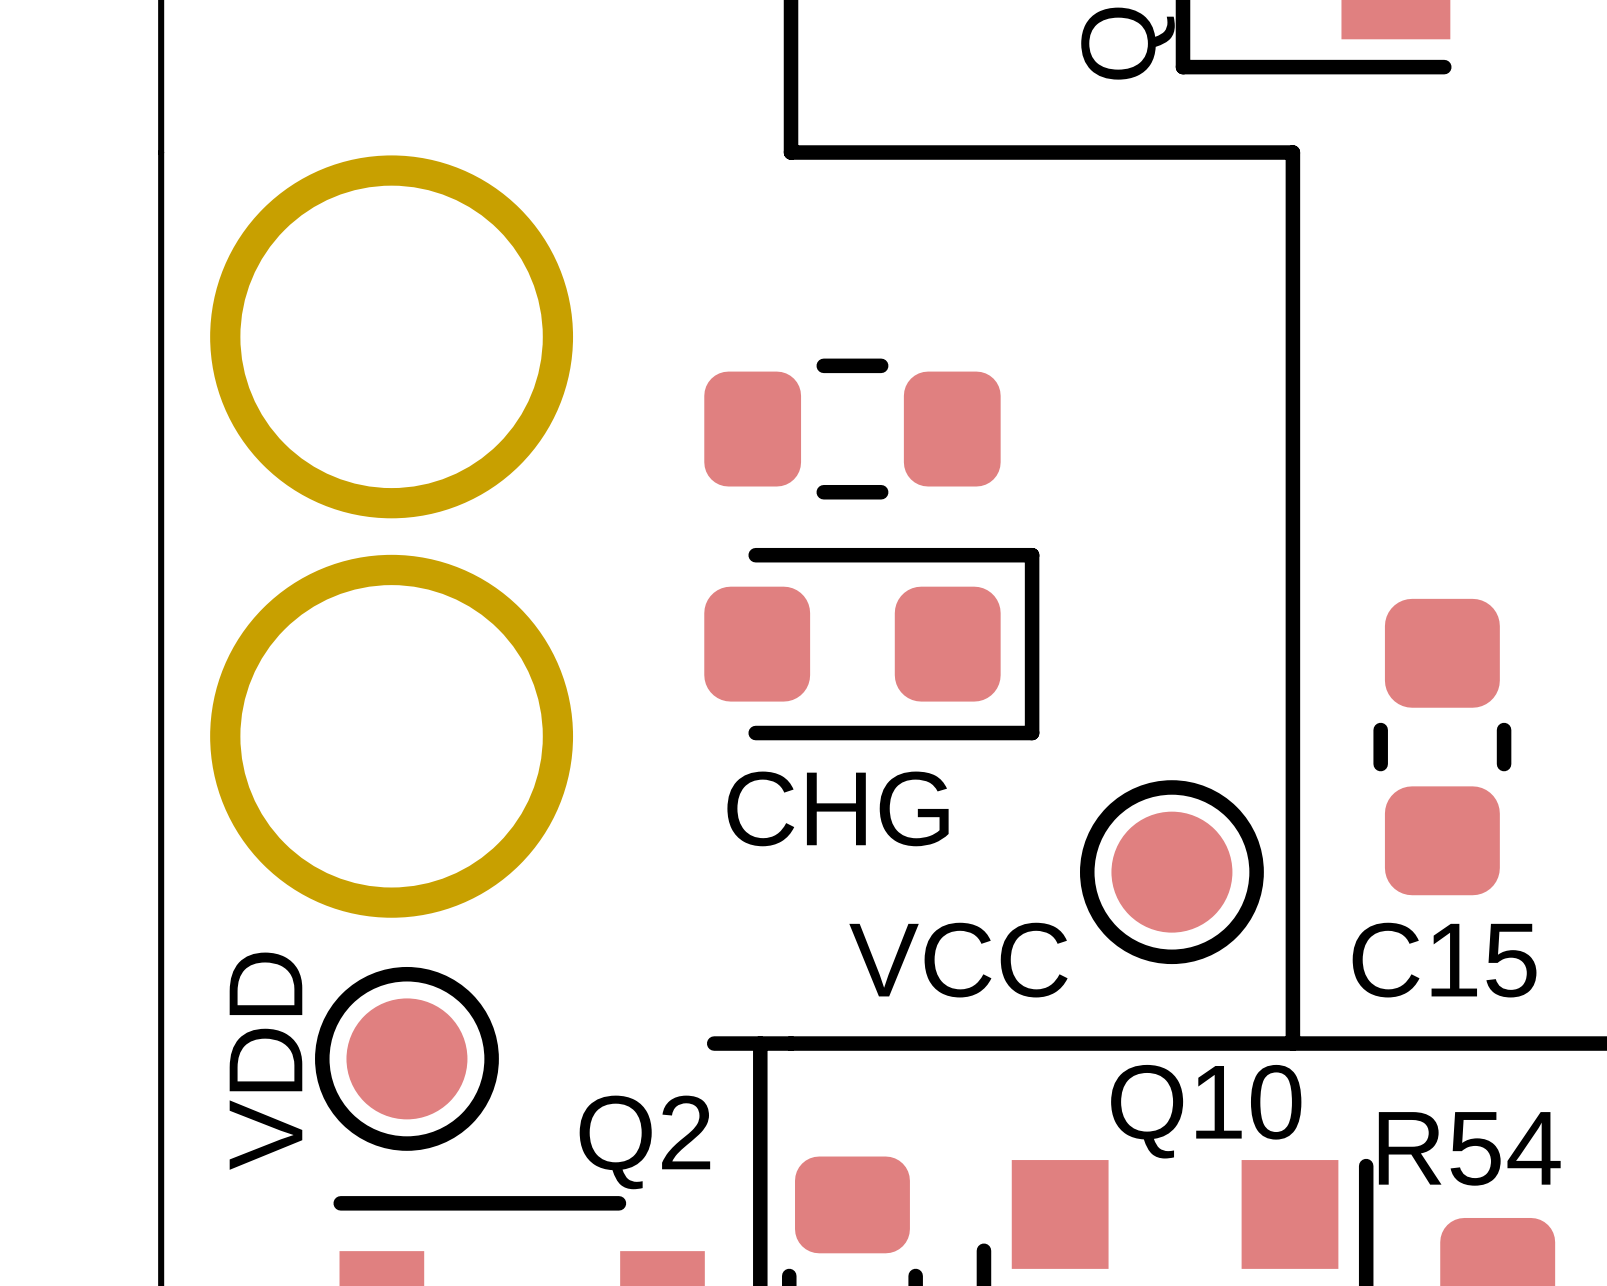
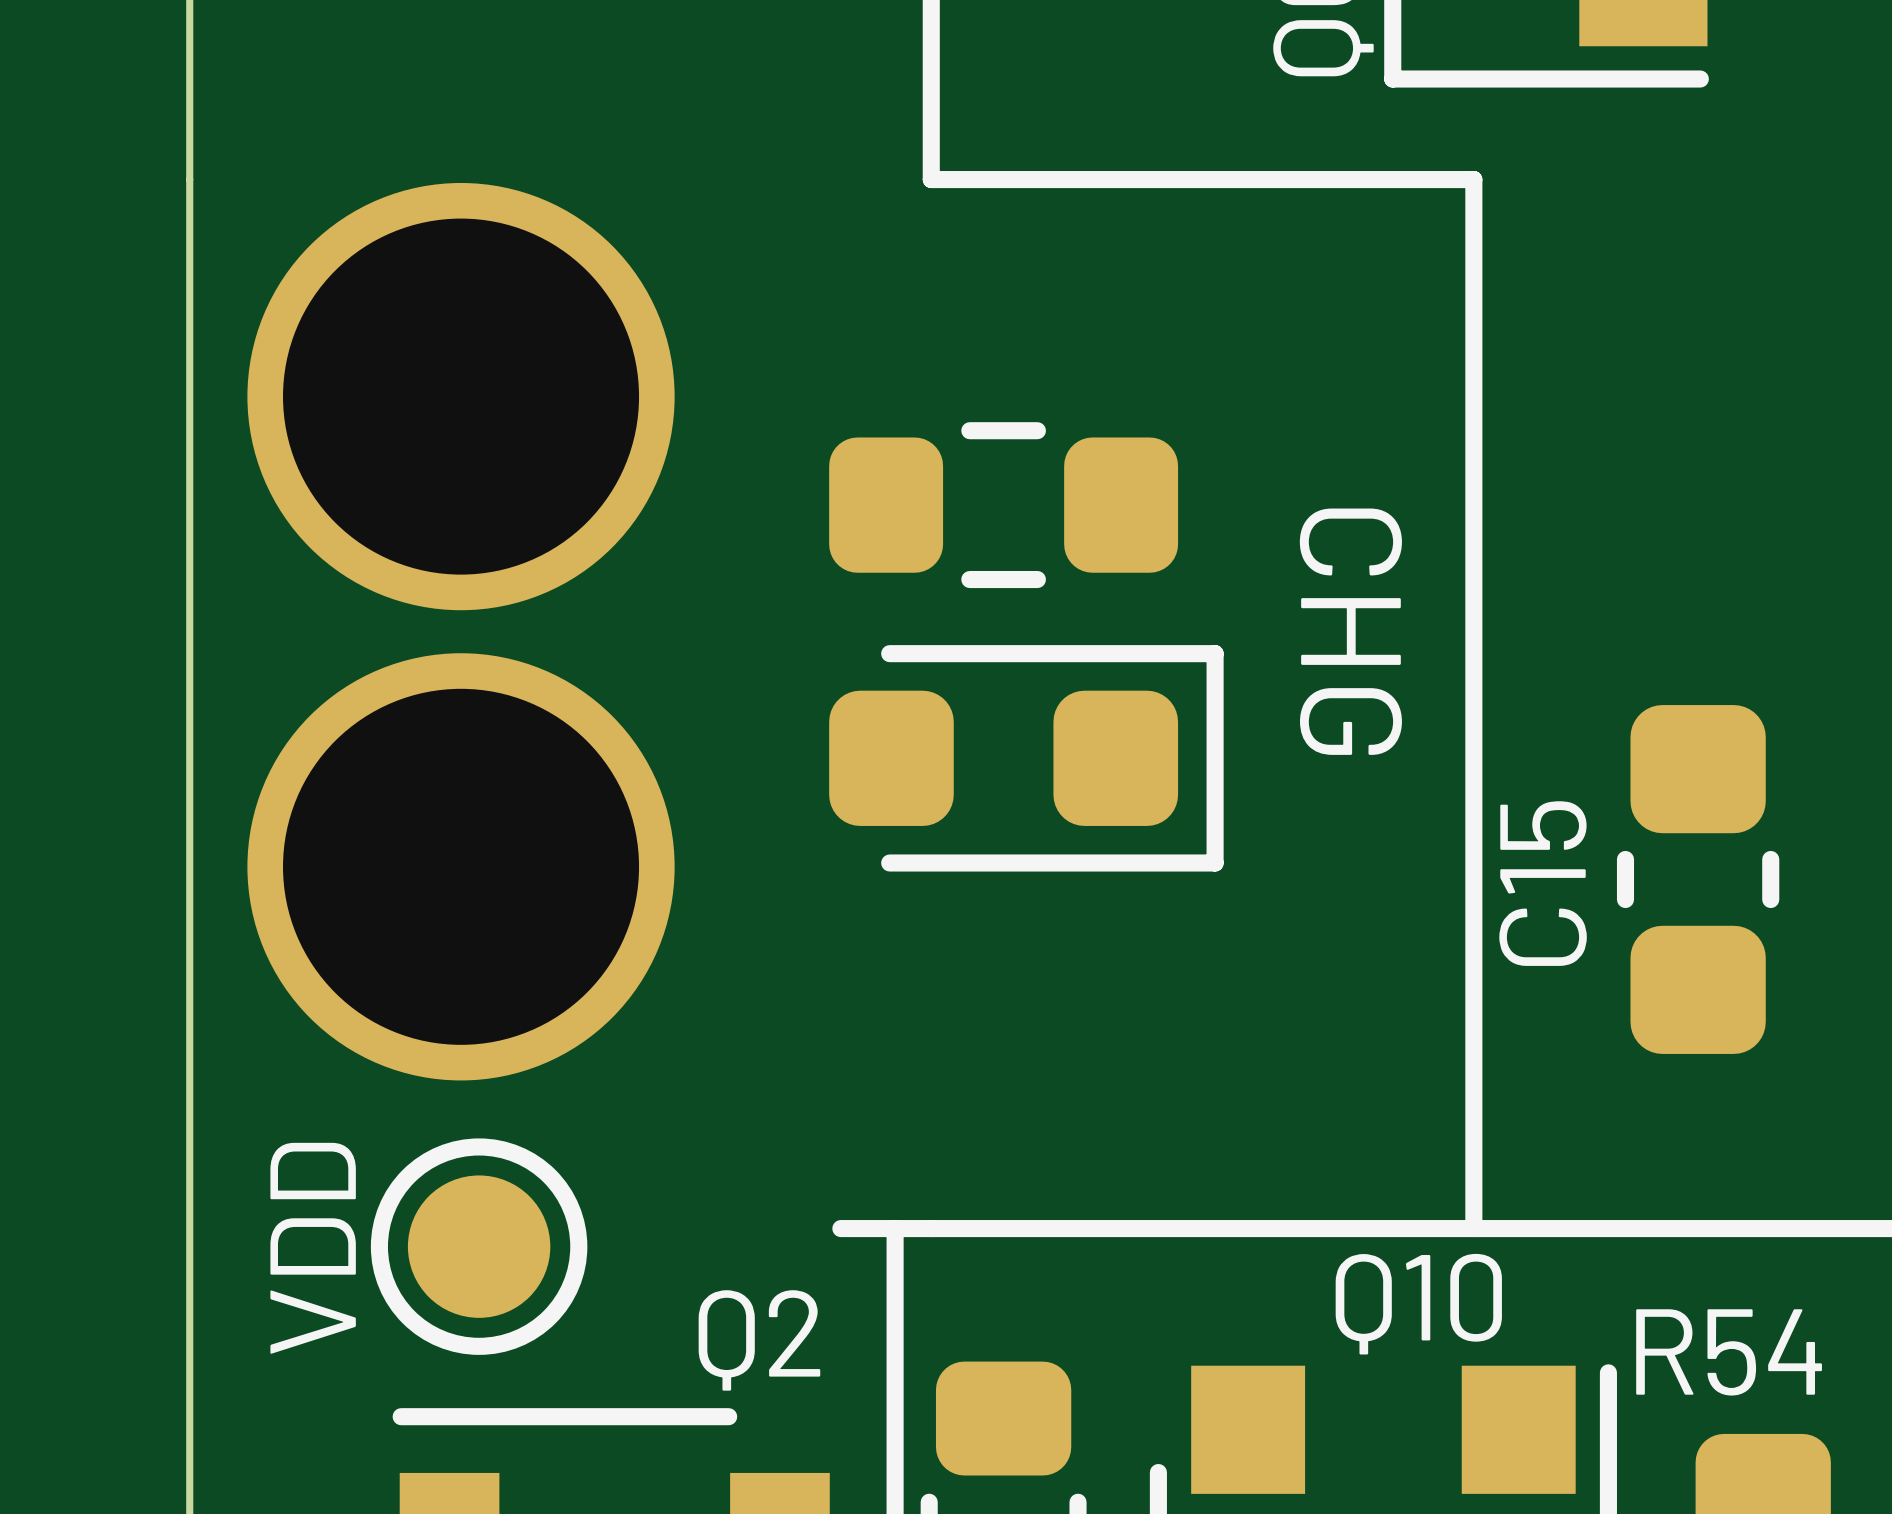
line: (1251, 152) (1292, 152) (1292, 1043) -> (1473, 179) (1473, 1228)
text rotation: 0° (838, 808) -> 90° clockwise (1350, 631)
text position: CHG (838, 808) -> CHG (1350, 631)
part: (1171, 872) -> none
text: VCC (958, 960) -> none
C15 name rotation: 0° (1444, 960) -> 90° counterclockwise (1543, 883)

